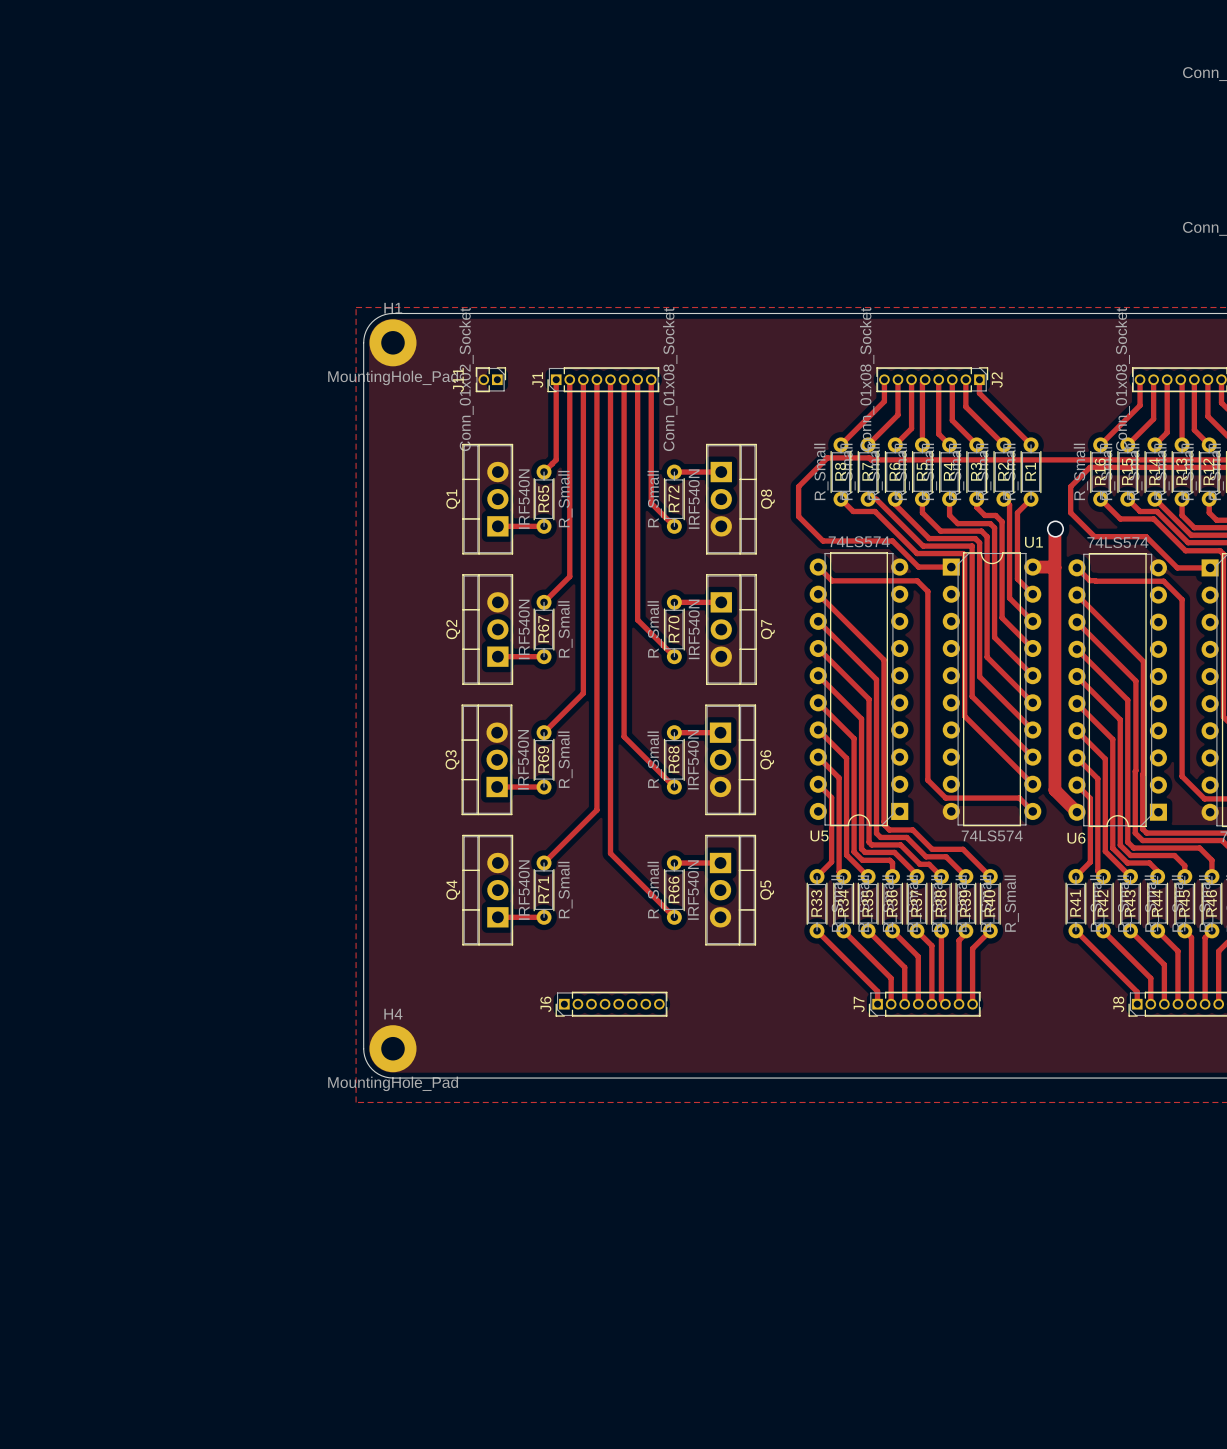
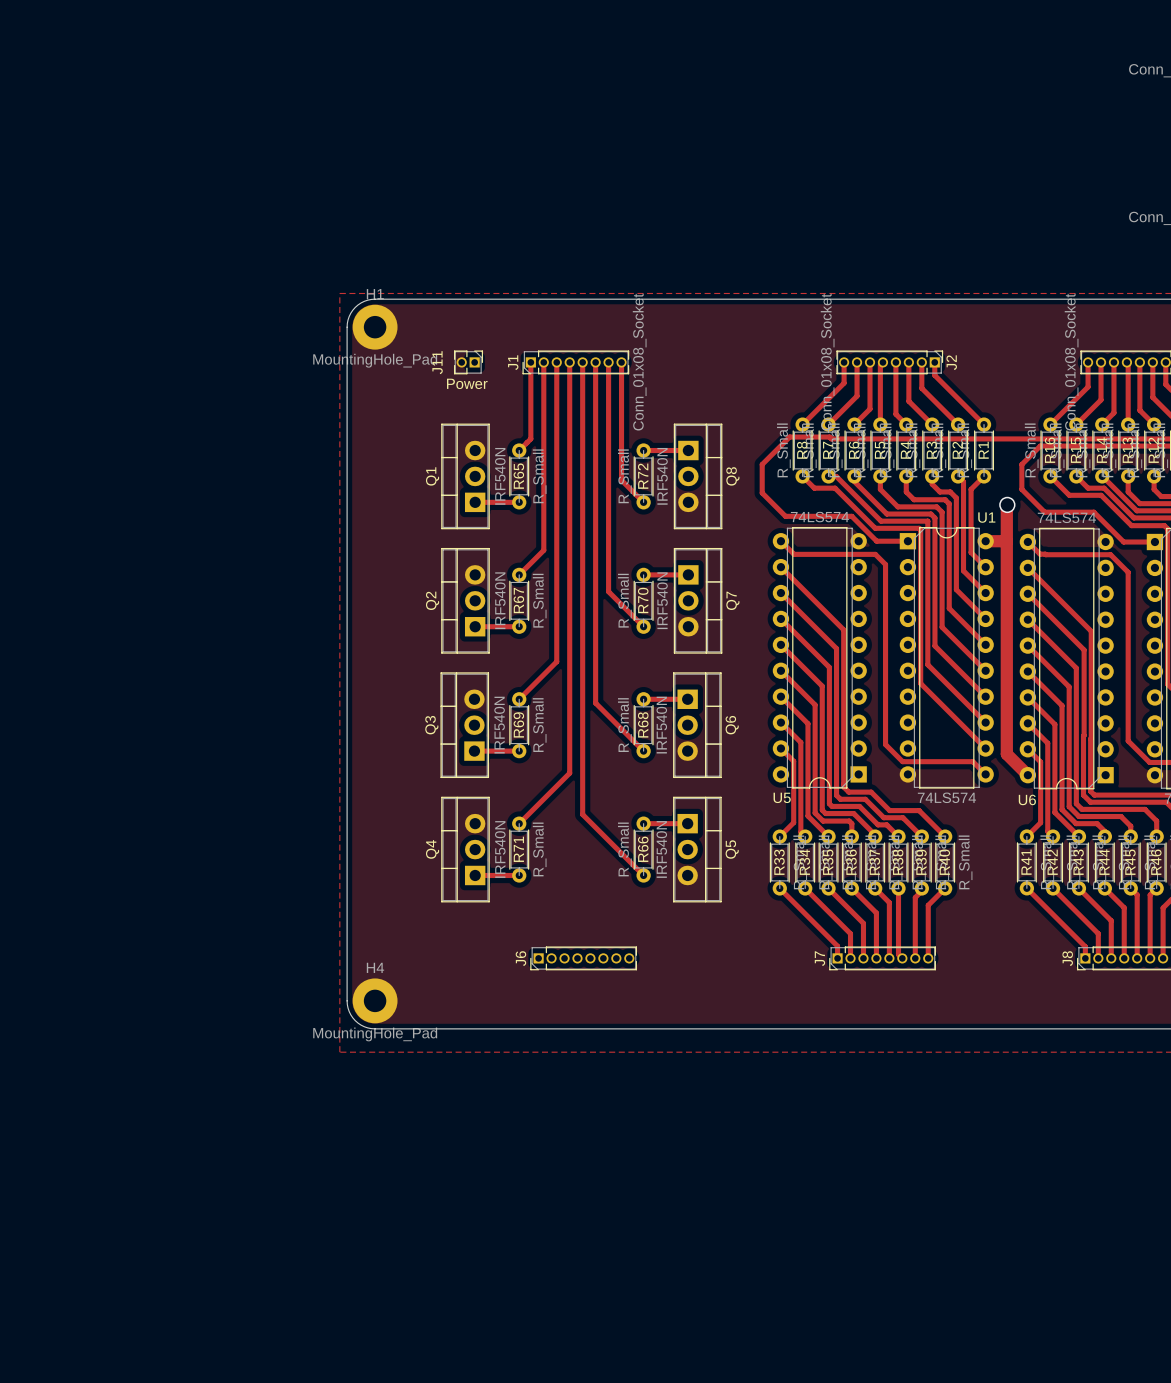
J11 value: Conn_01x02_Socket (466, 379) -> Power (467, 383)

